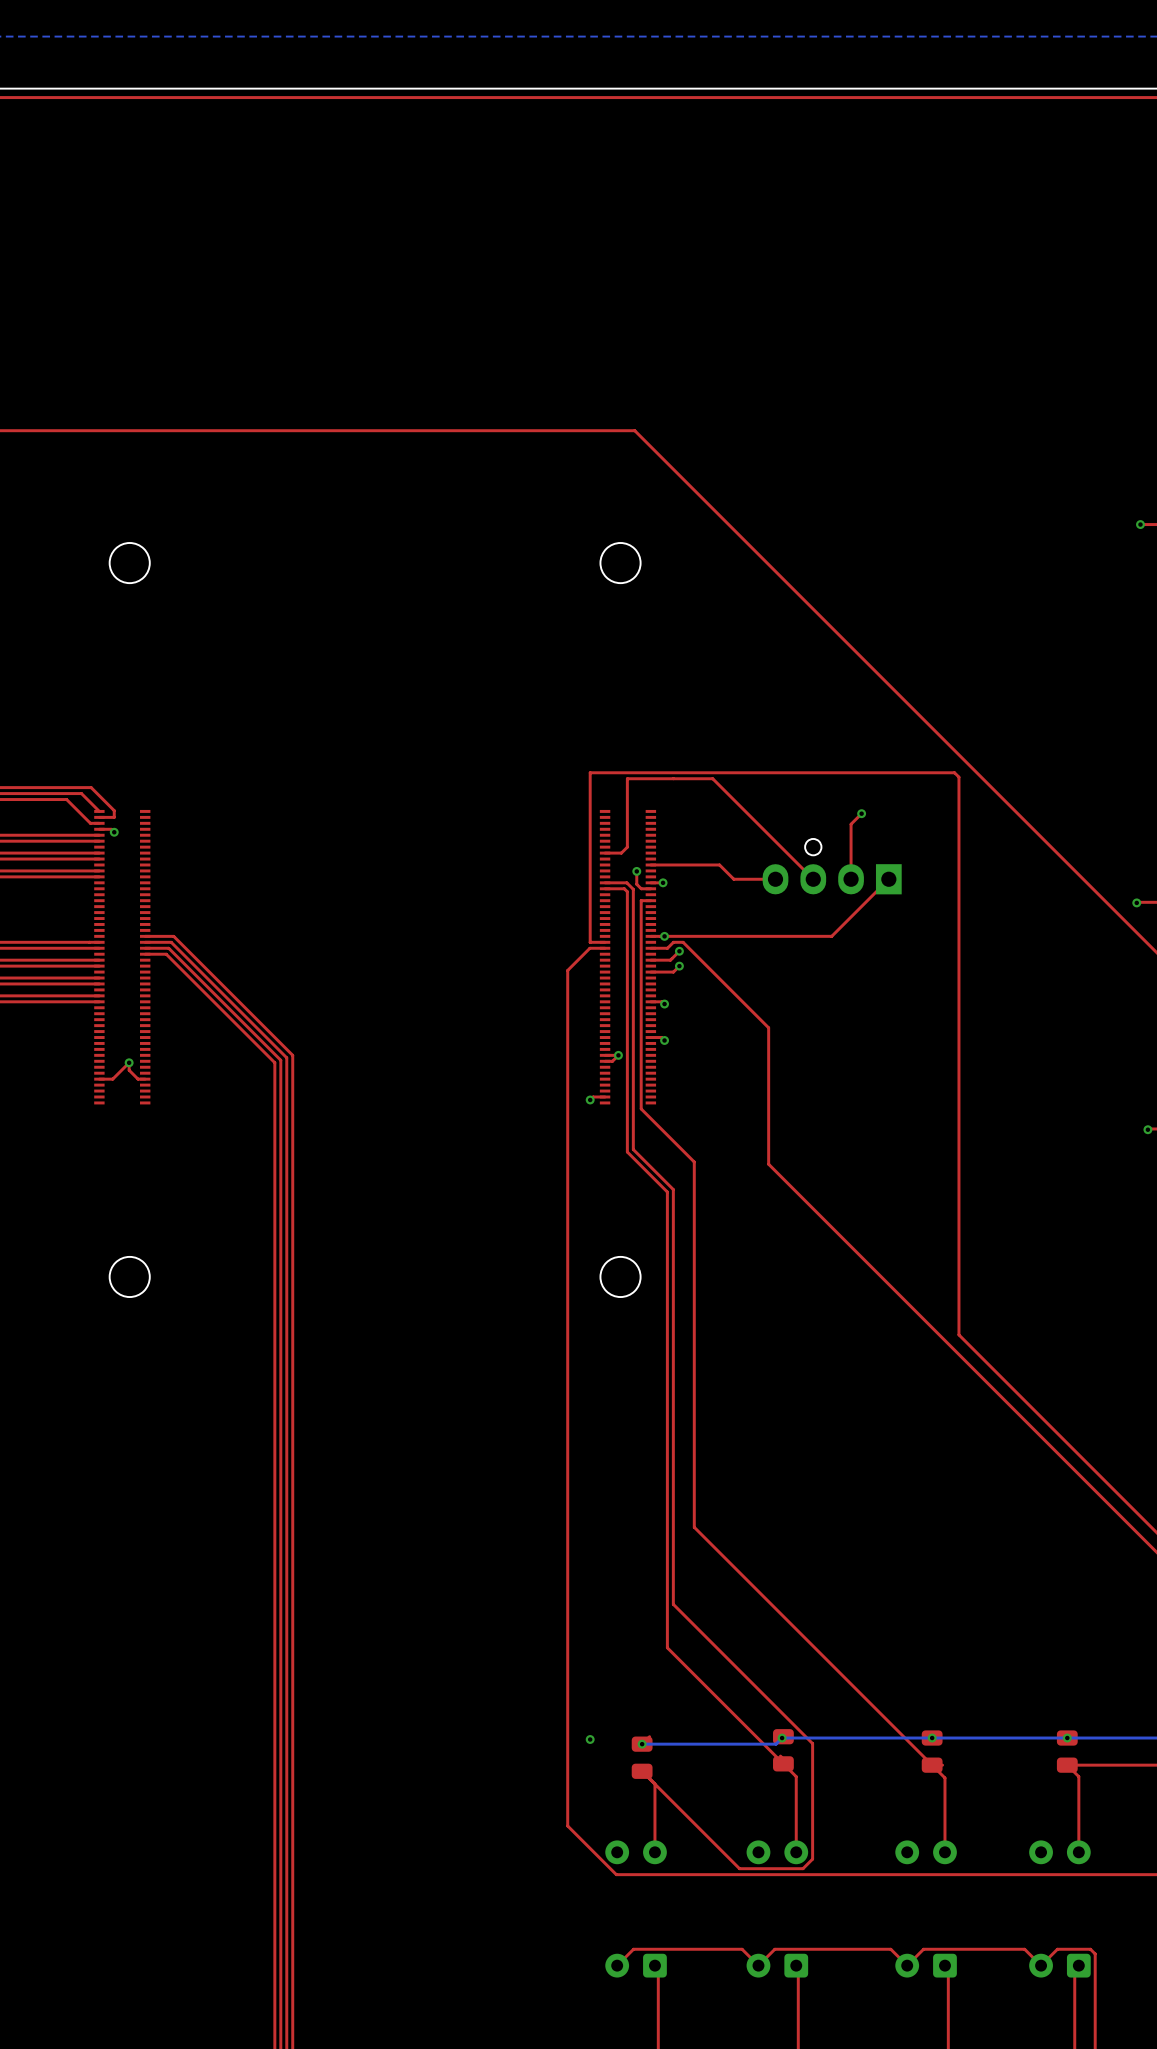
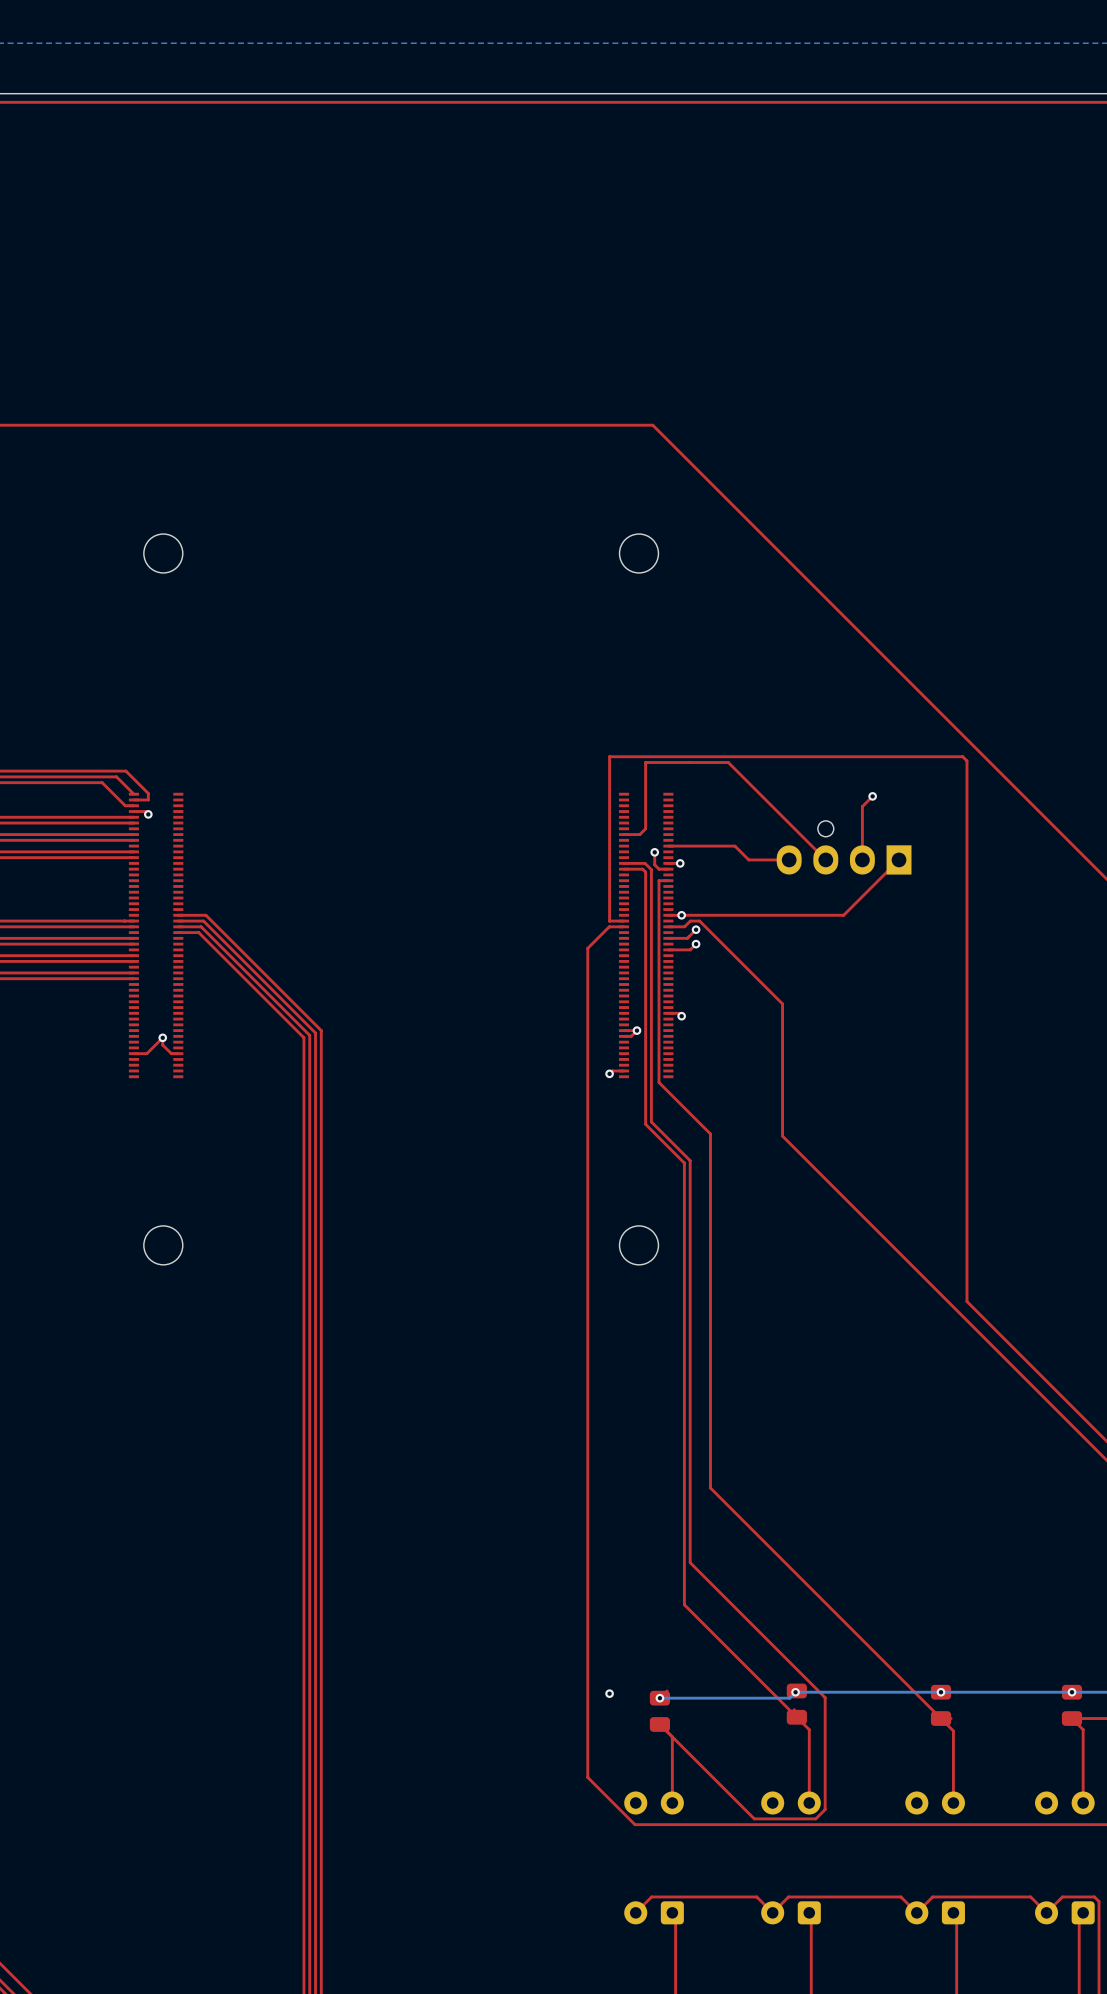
top track: (650, 1001) (662, 1001) (664, 1004) -> none
via: (664, 1004) -> none

